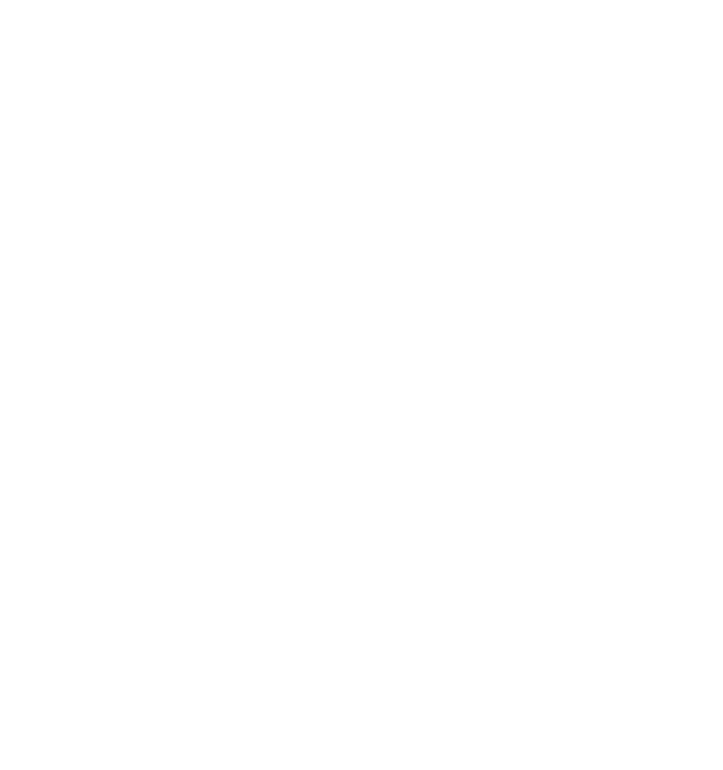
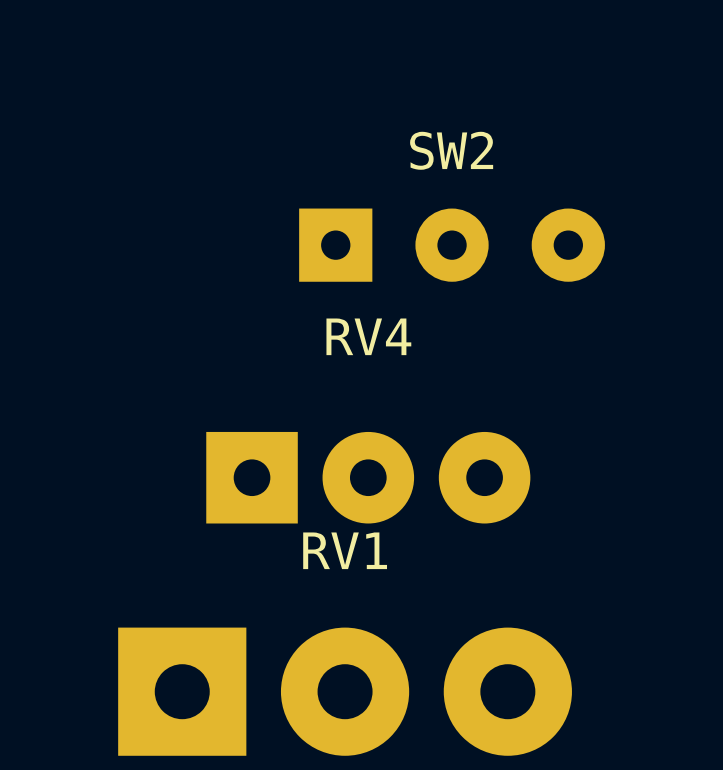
SW2: none -> (452, 245)
RV4: none -> (368, 477)
RV1: none -> (345, 691)

